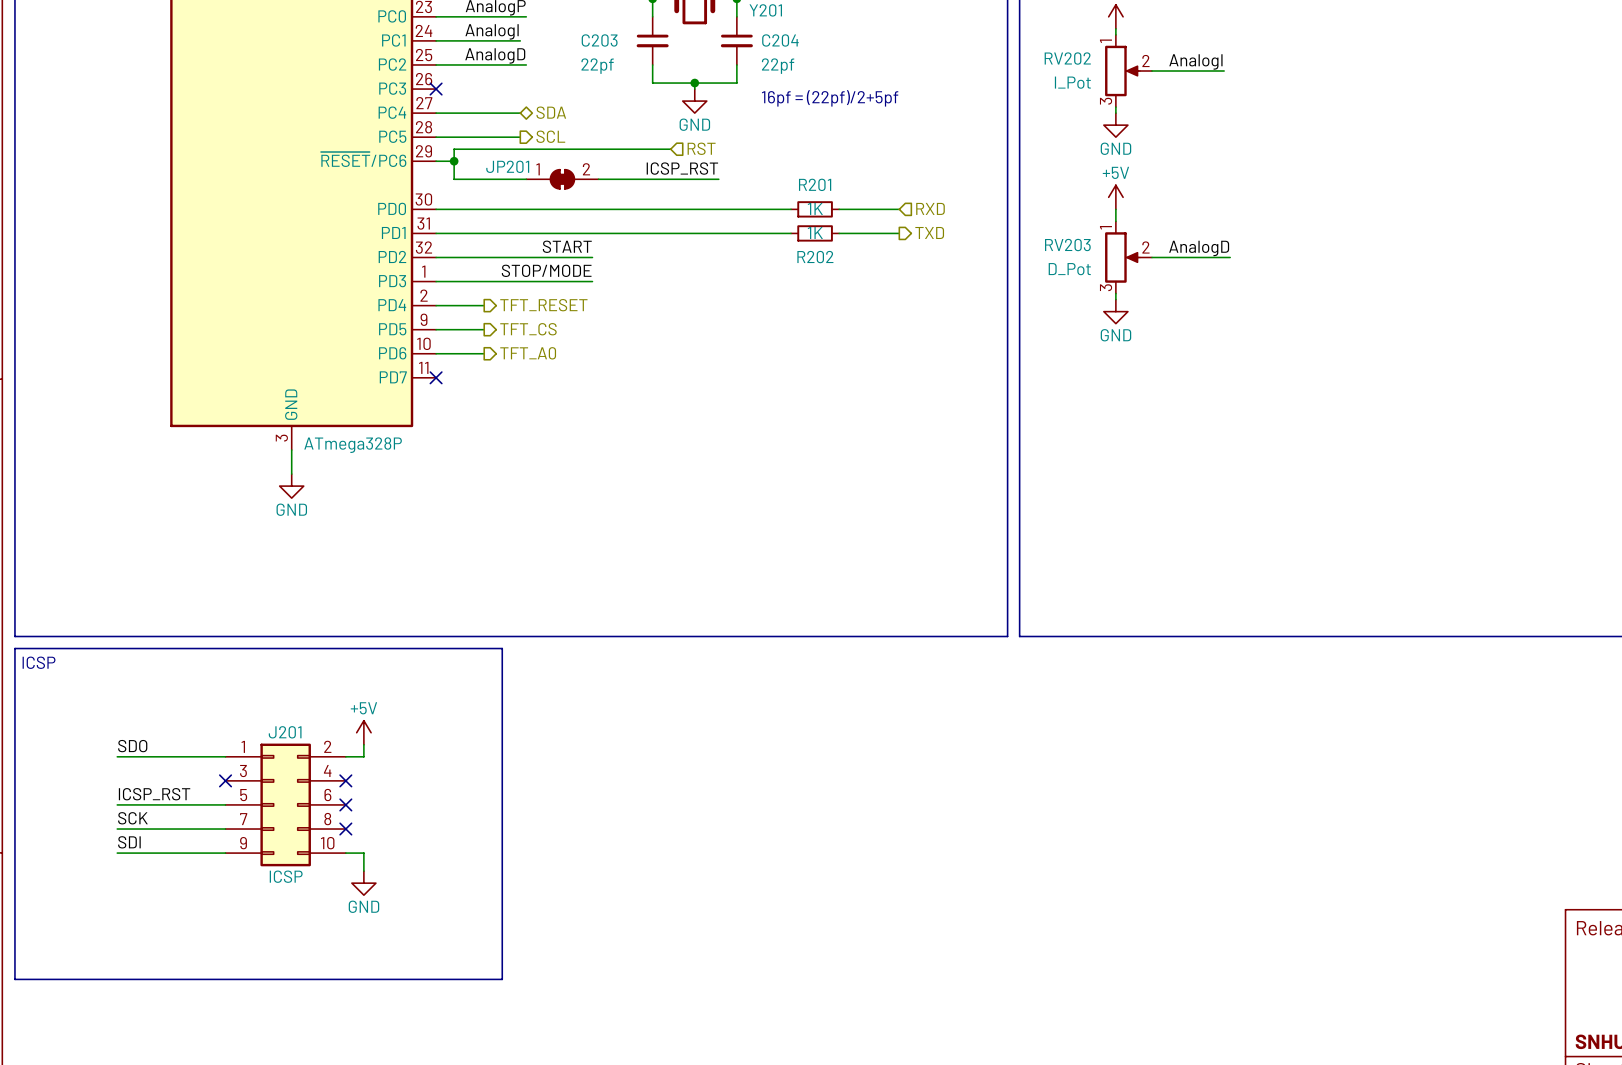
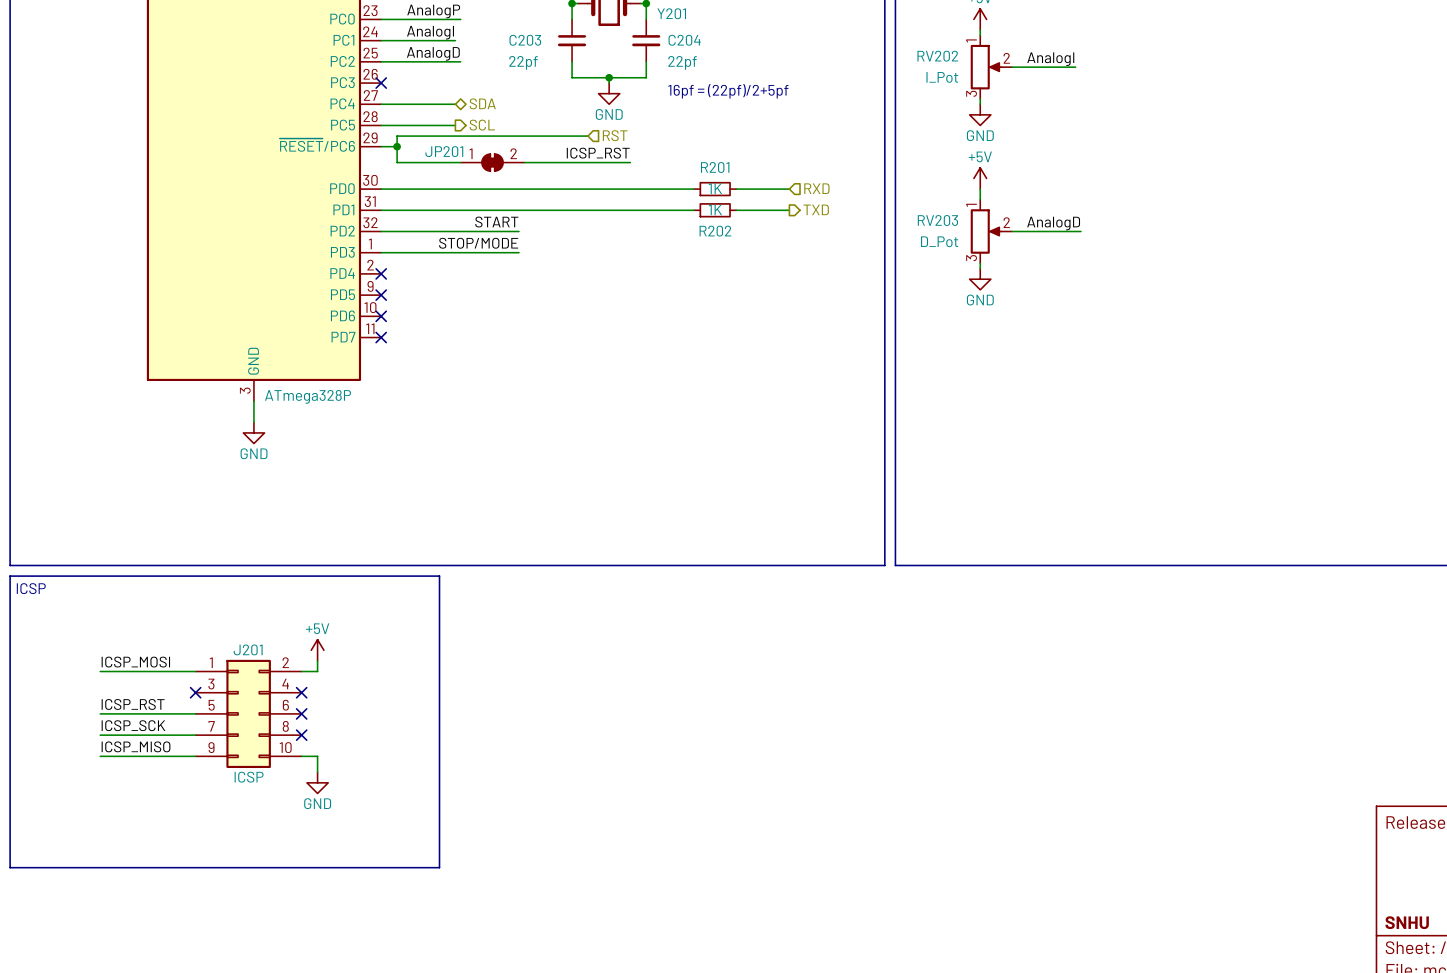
wire: (436, 305) (484, 305) -> none
no-connect mark: none -> (381, 273)
hierarchical label: TFT_RESET (543, 305) -> none
wire: (436, 329) (484, 329) -> none
no-connect mark: none -> (381, 295)
hierarchical label: TFT_CS (528, 329) -> none
wire: (436, 353) (484, 353) -> none
no-connect mark: none -> (381, 316)
hierarchical label: TFT_A0 (528, 353) -> none
label: SDO (132, 746) -> ICSP_MOSI (135, 662)
label: SCK (132, 818) -> ICSP_SCK (133, 725)
label: SDI (129, 842) -> ICSP_MISO (136, 746)

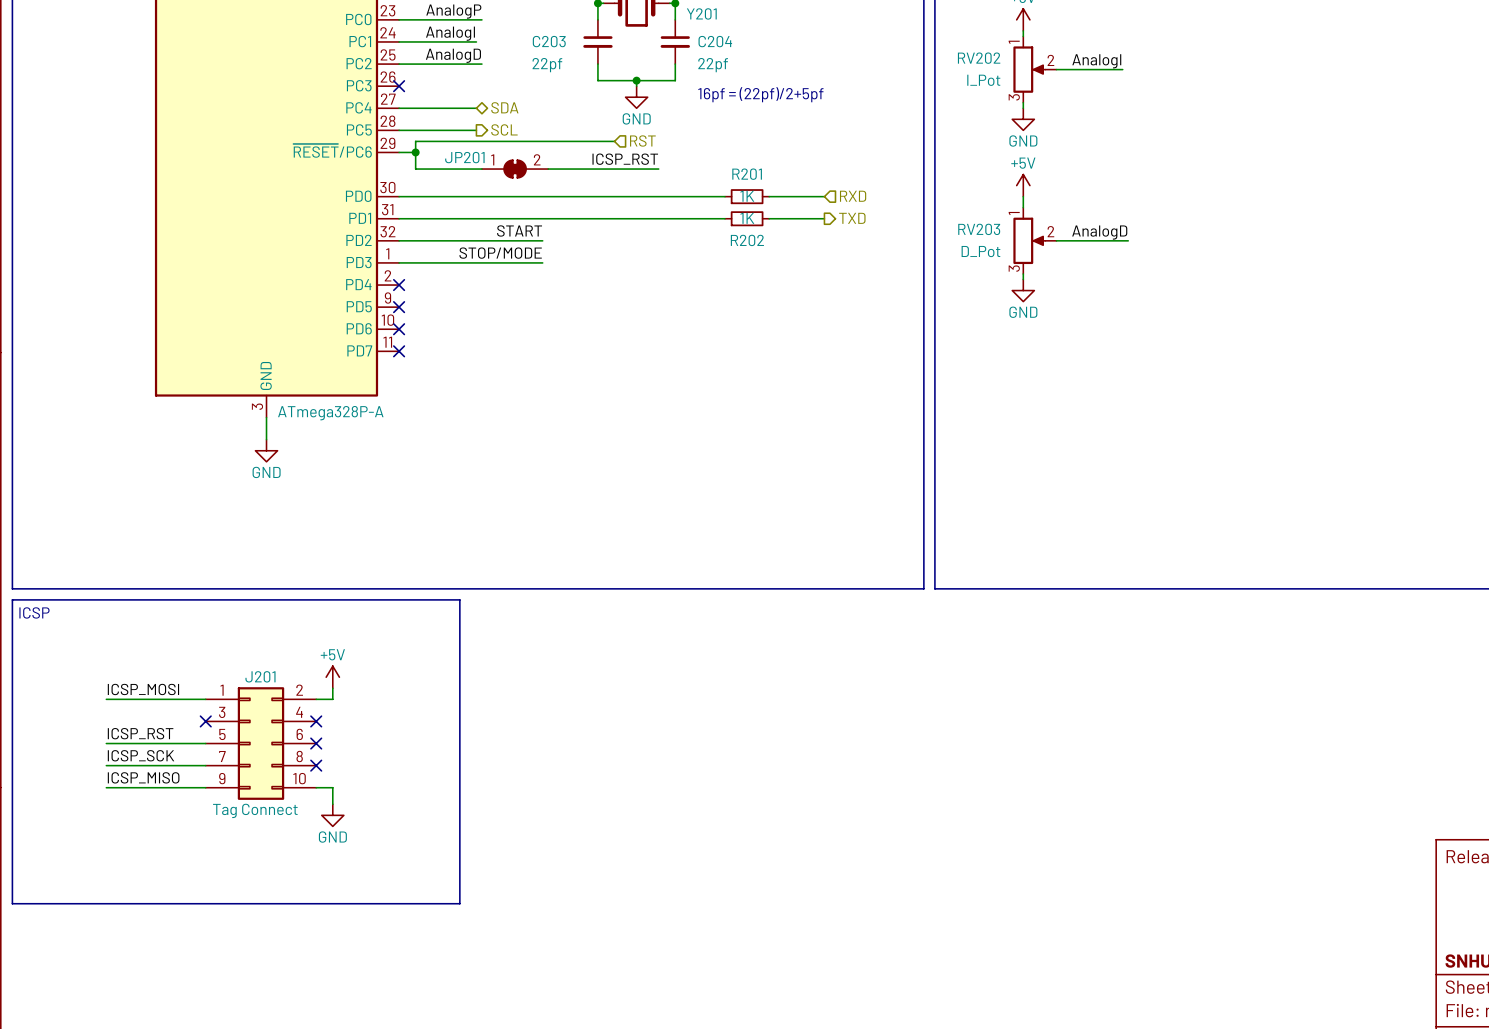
part value: ATmega328P (308, 396) -> ATmega328P-A (330, 413)
J201 value: ICSP (249, 777) -> Tag Connect (255, 810)

